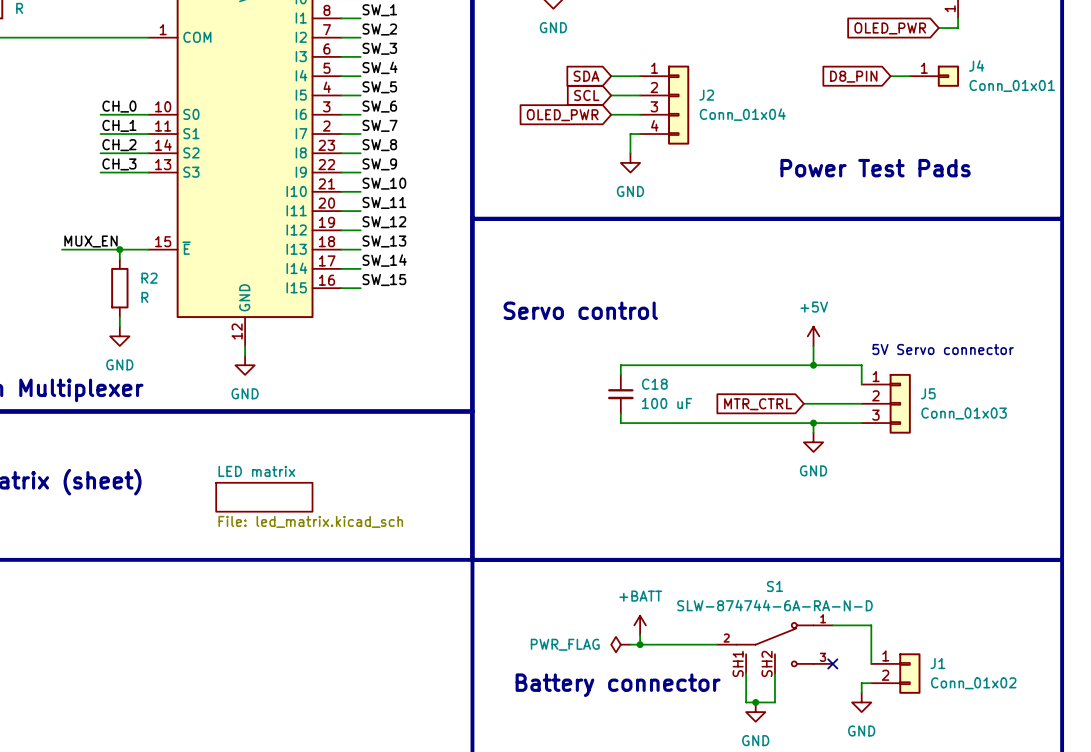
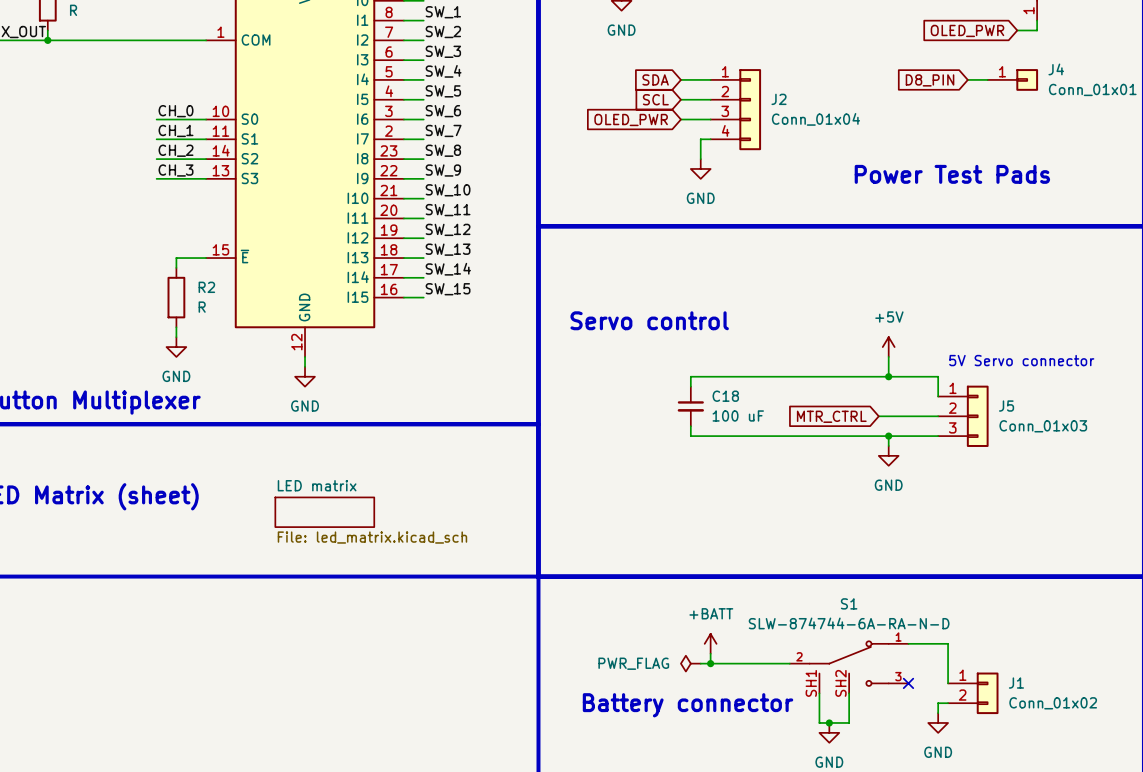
label: MUX_EN (90, 241) -> none
wire: (62, 249) (119, 249) -> none
junction: (119, 249) -> none

